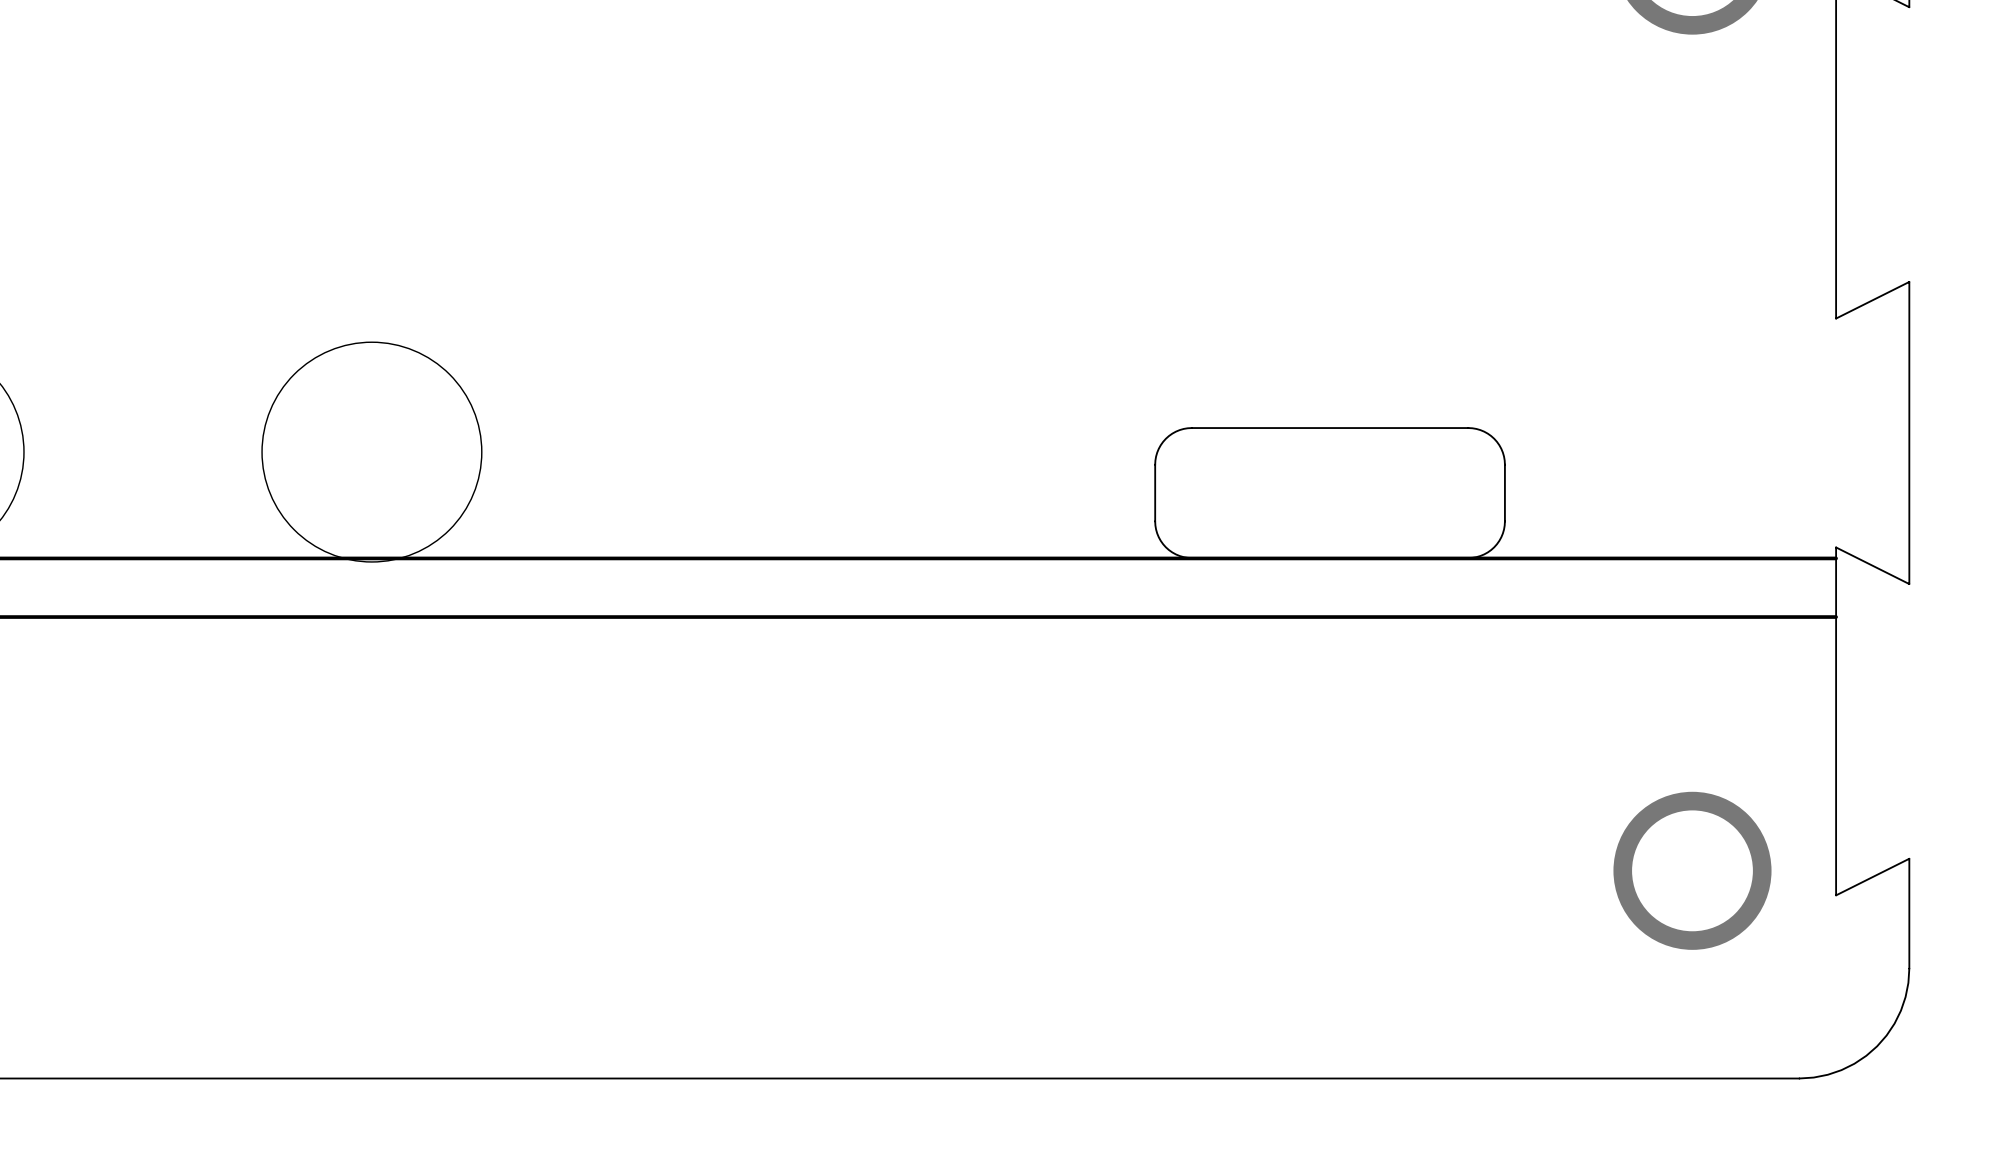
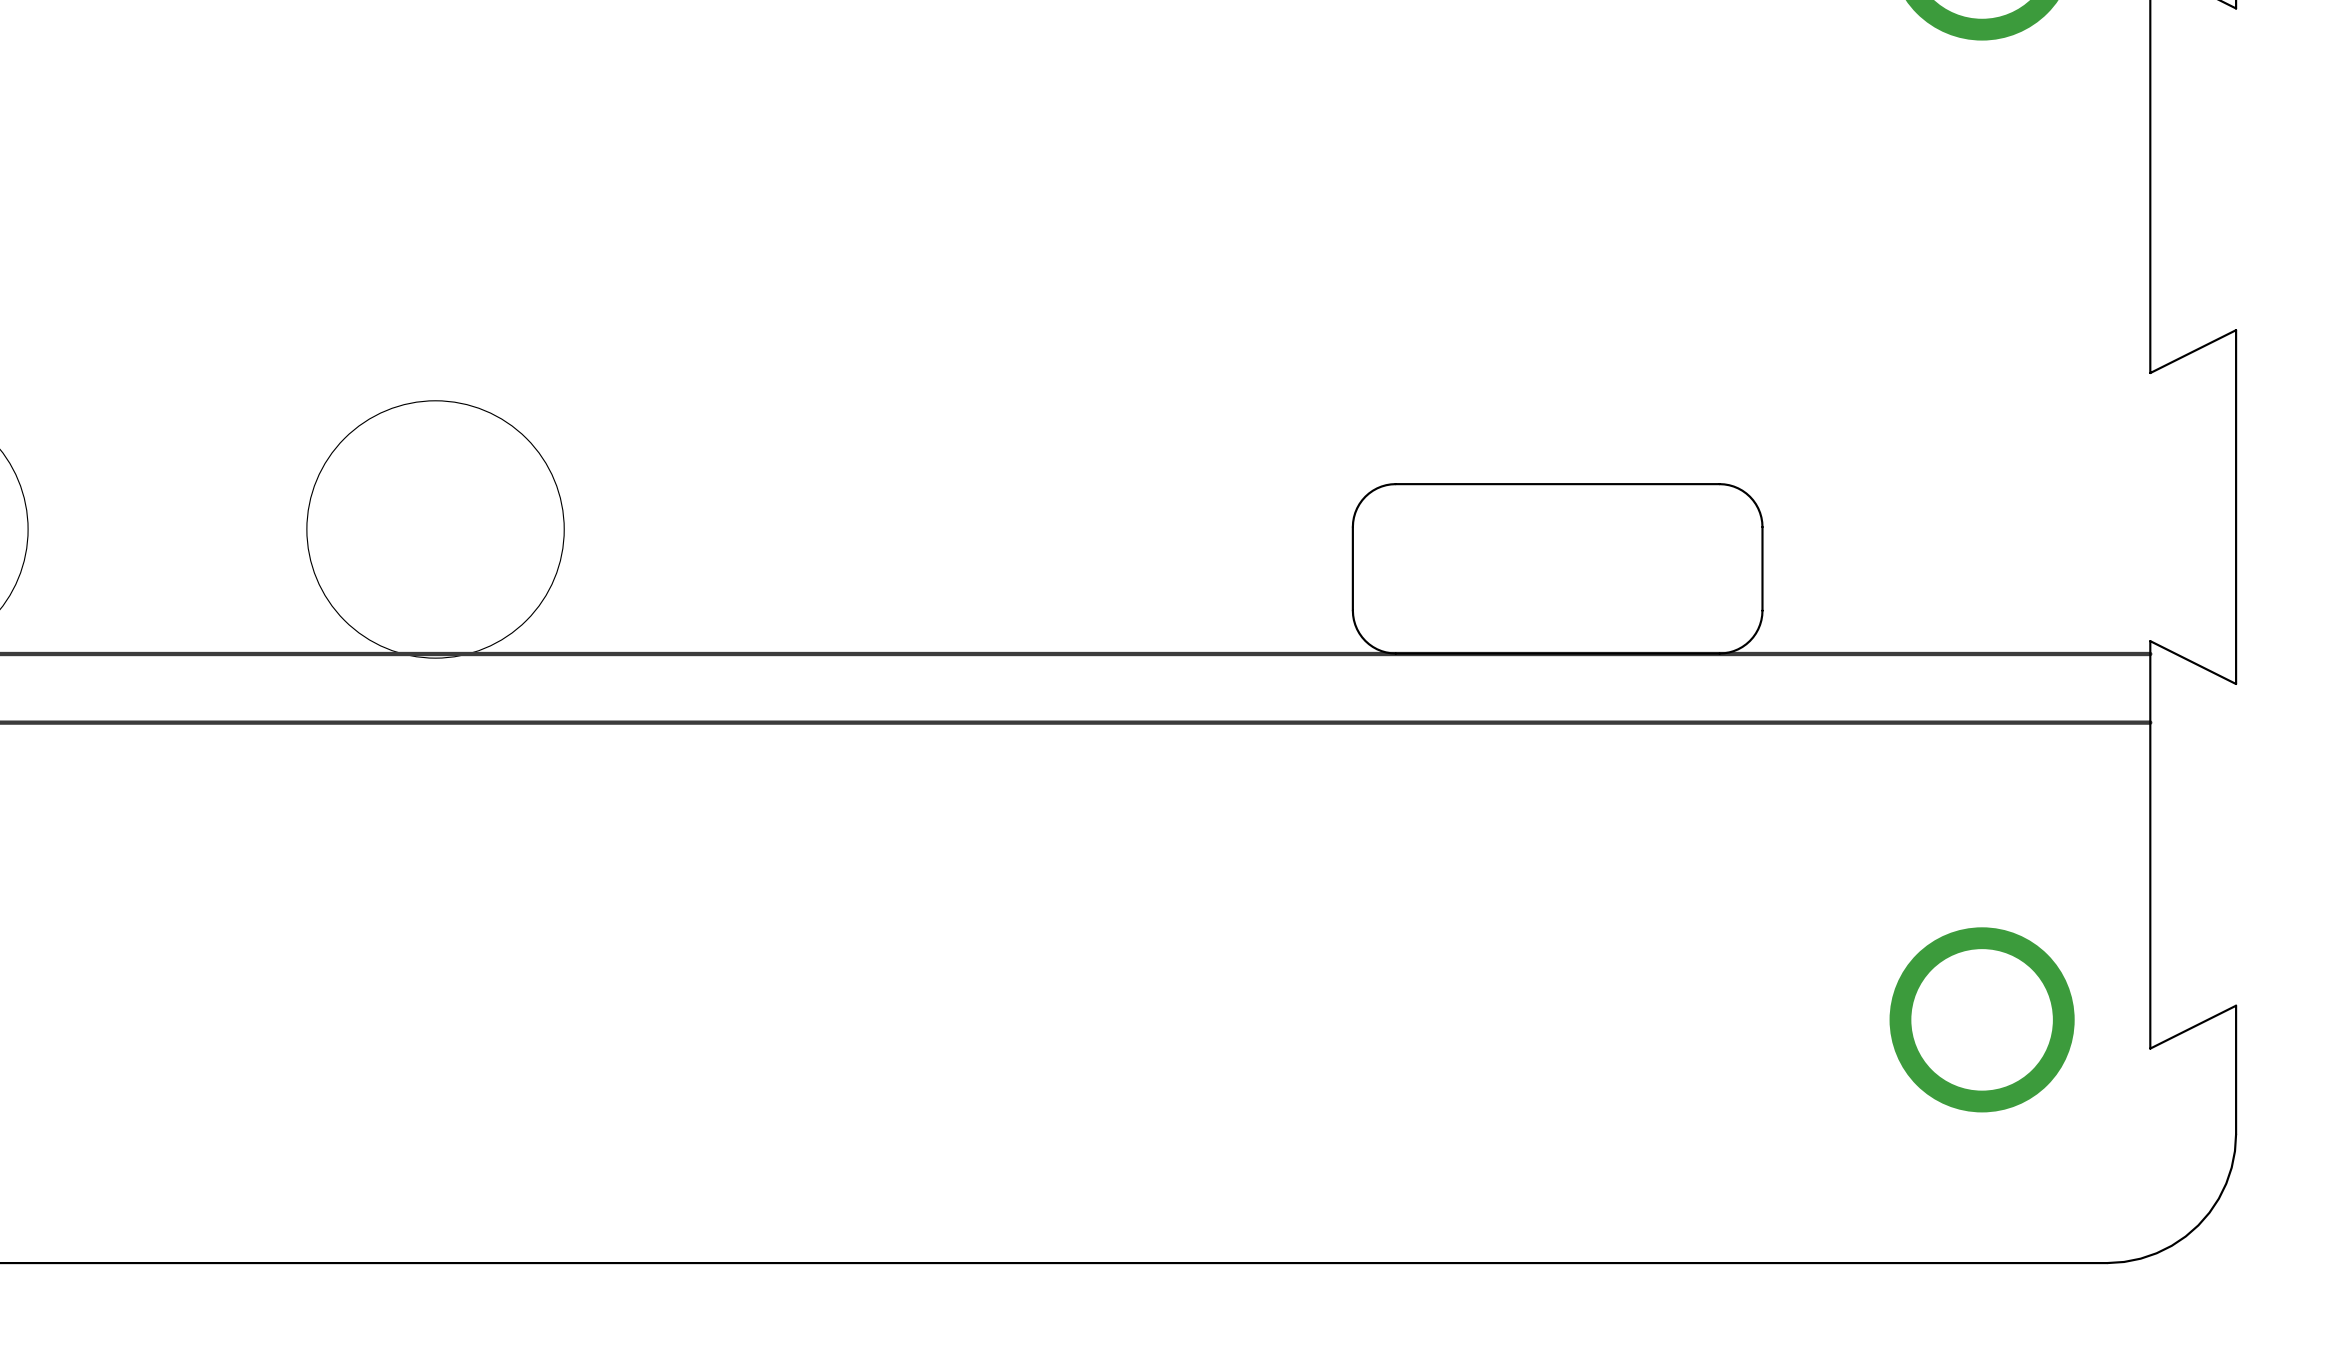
board edge: (1504, 464) (1502, 452) (1494, 438) (1480, 430) (1468, 428) (1187, 428) (1175, 431) (1165, 438) (1158, 448) (1155, 464) -> (1762, 544) (1761, 517) (1753, 500) (1738, 488) (1719, 484) (1390, 484) (1372, 490) (1359, 504) (1353, 522) (1352, 544)

